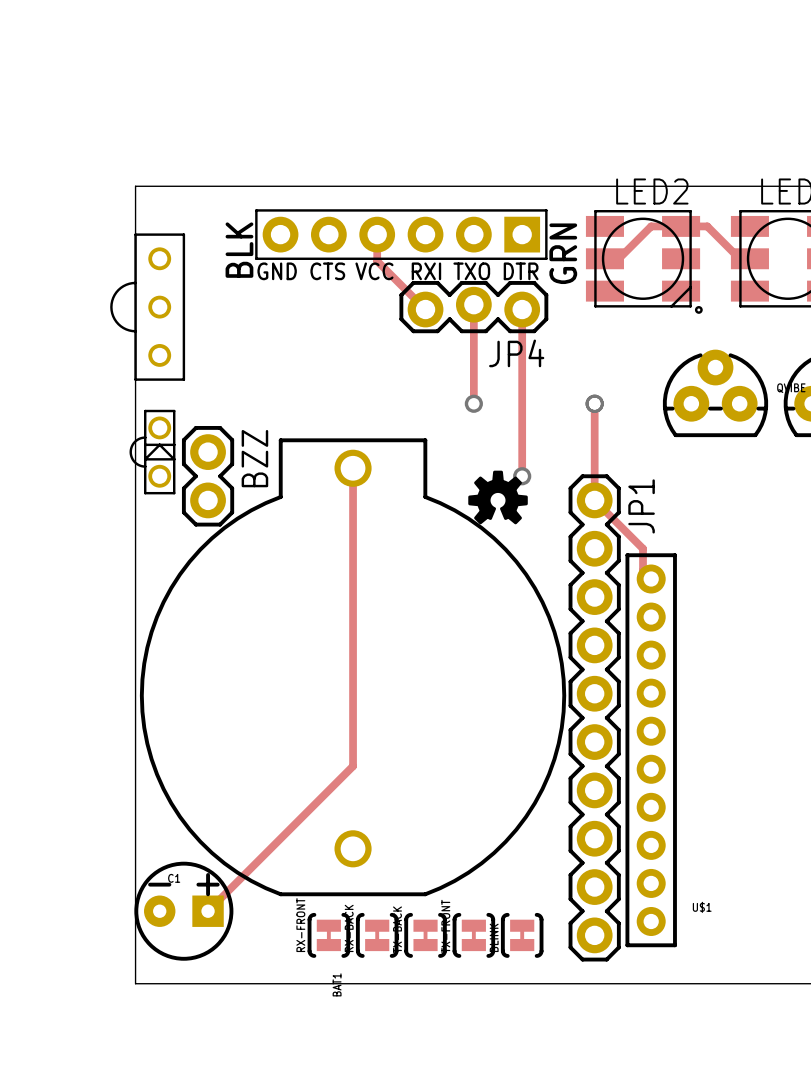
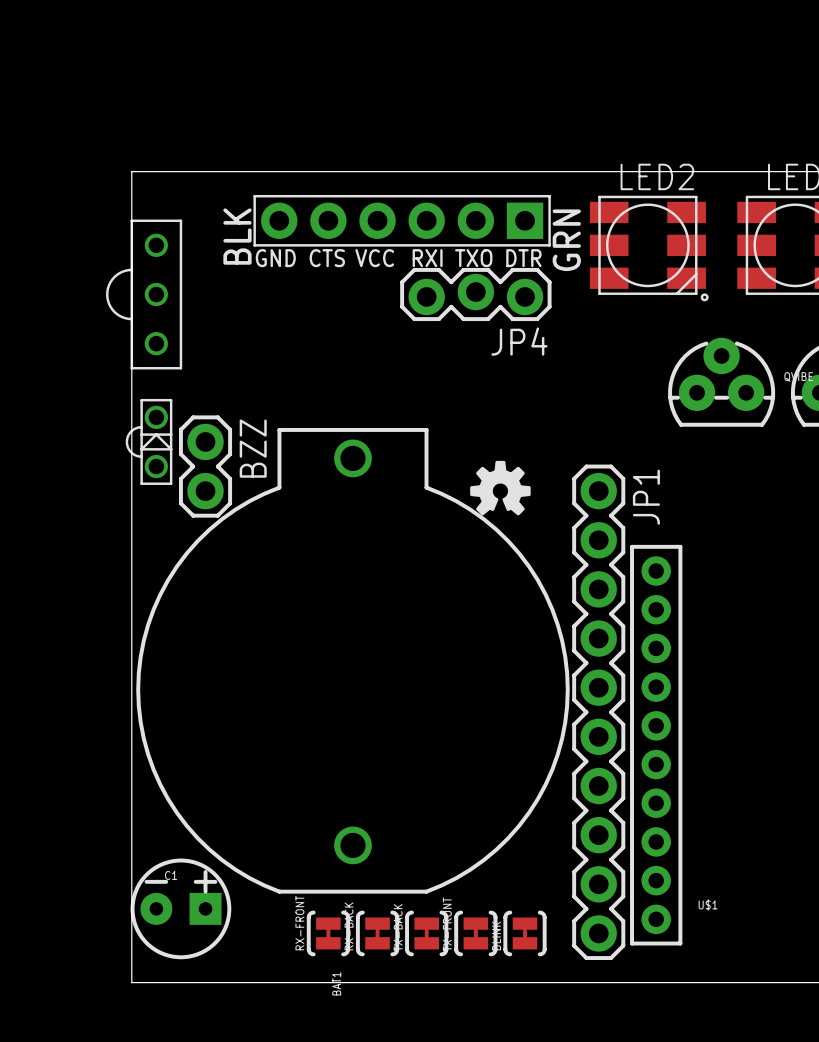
track: (377, 234) (377, 261) (425, 309) -> none
track: (618, 258) (651, 226) (707, 226) (739, 258) -> none
track: (473, 304) (473, 403) -> none
track: (522, 309) (522, 476) -> none
via: (473, 403) -> none
track: (594, 403) (594, 500) (643, 548) (643, 570) (651, 579) -> none
via: (594, 403) -> none
track: (353, 468) (353, 766) (208, 911) -> none
via: (522, 476) -> none

